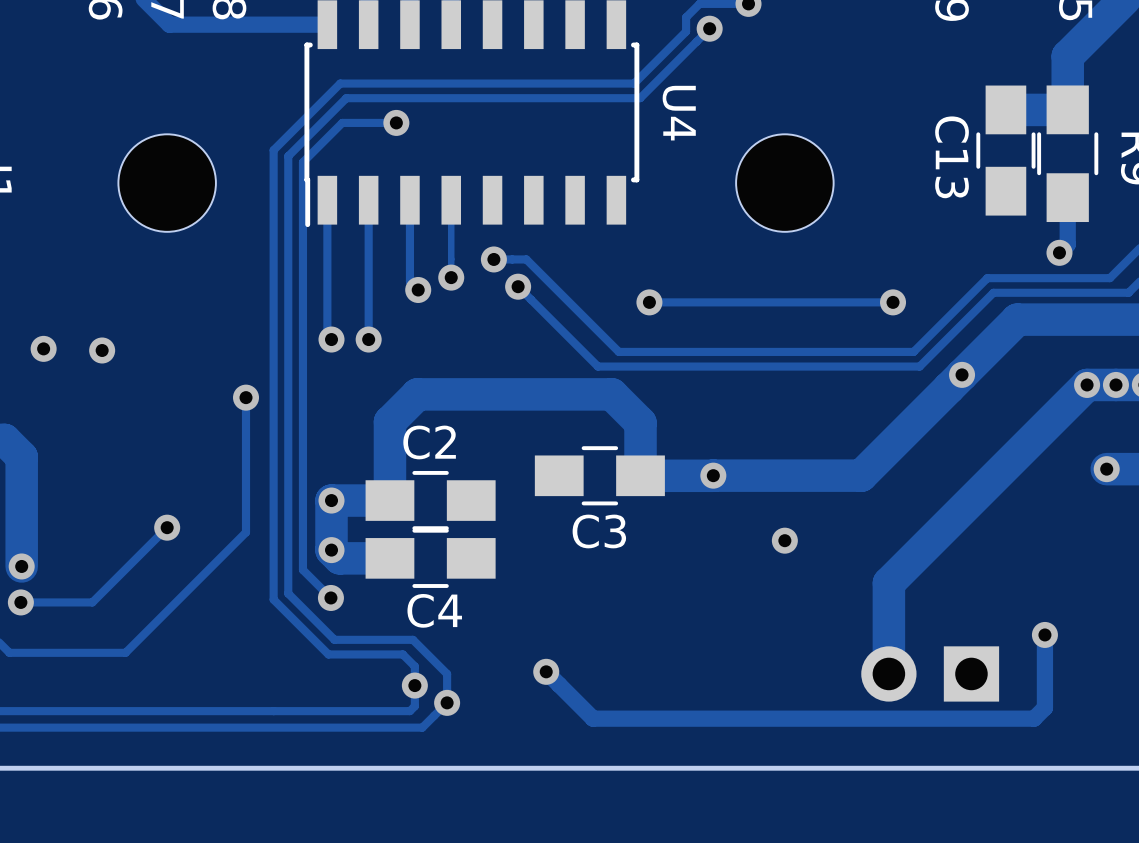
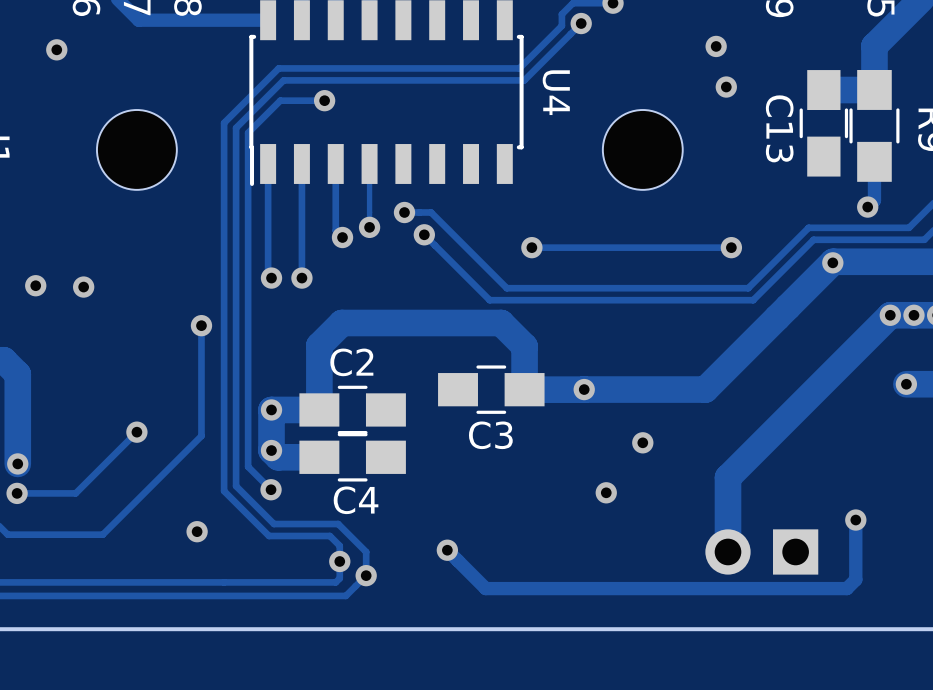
via: none -> (716, 46)
via: none -> (56, 49)
via: none -> (726, 87)
via position: (962, 374) -> (832, 262)
via: none -> (606, 492)
via: none -> (197, 531)

